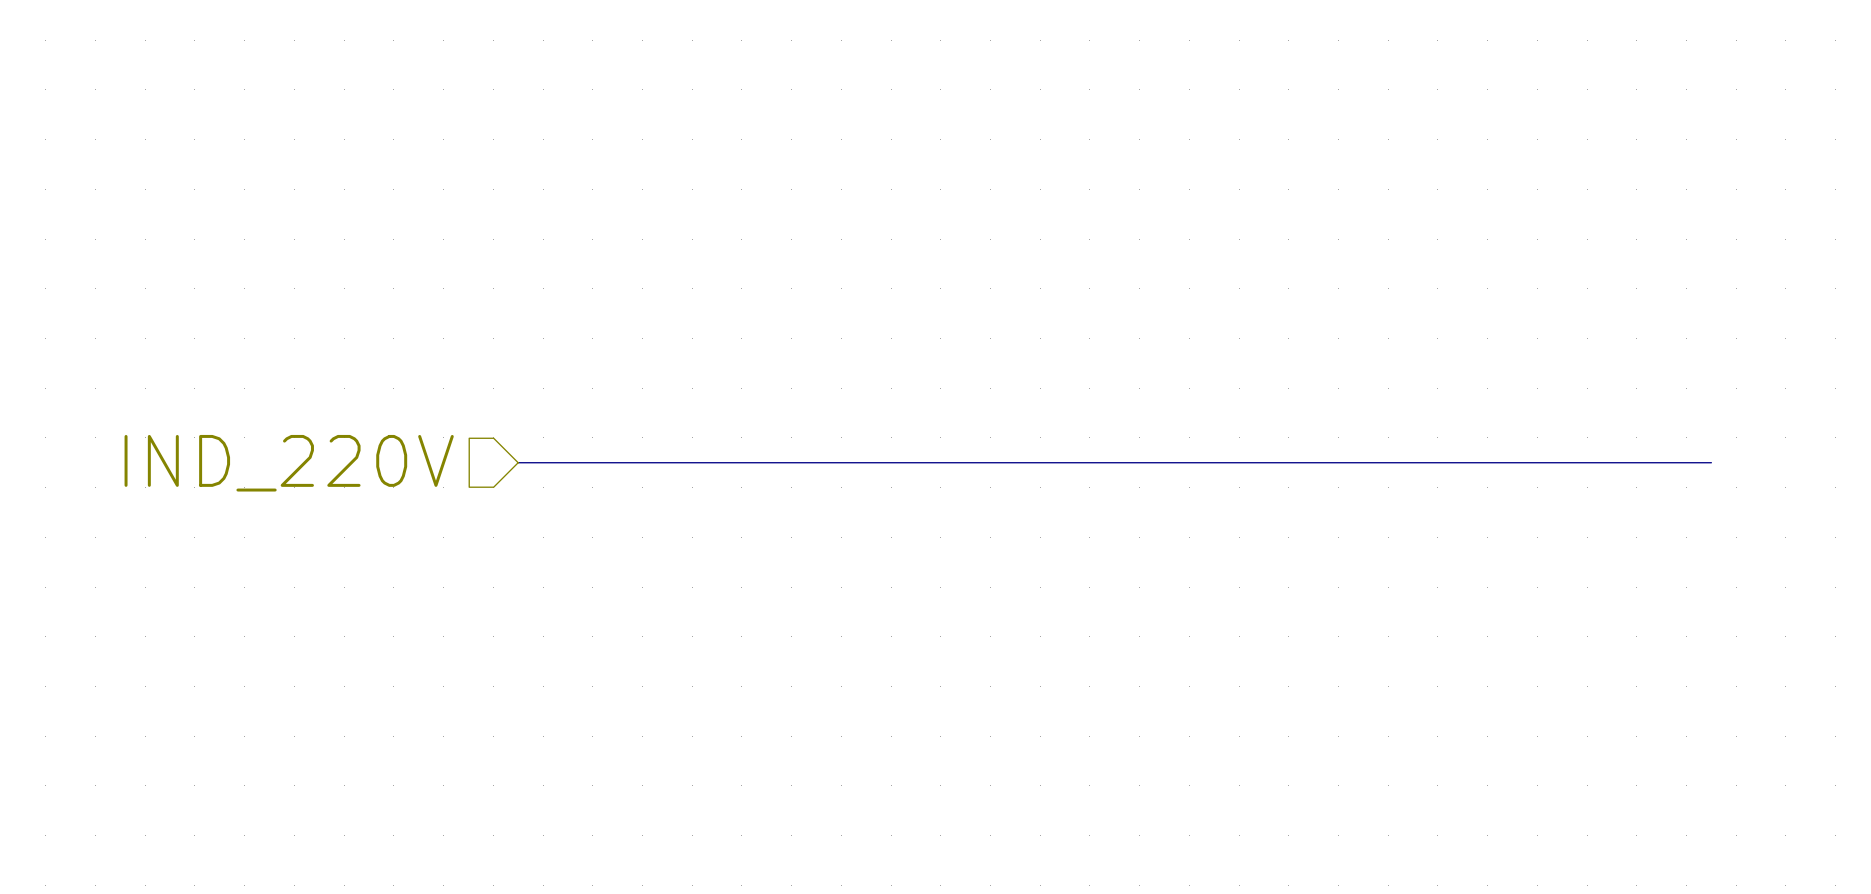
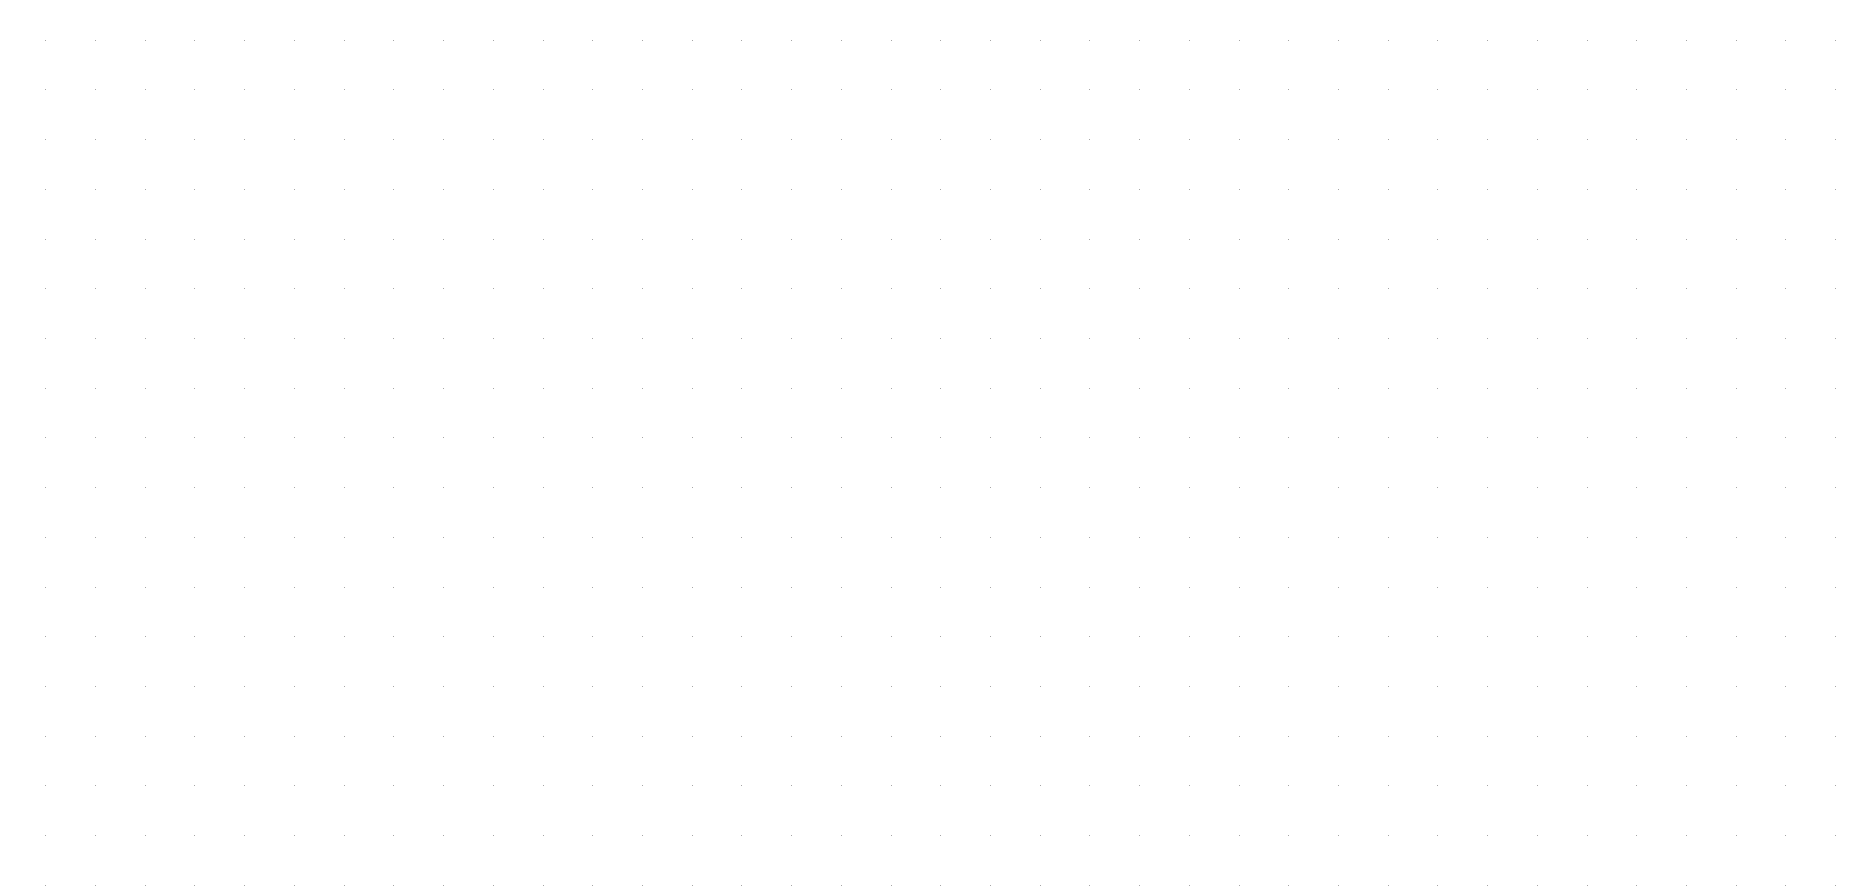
bus: (518, 462) (1711, 462) -> none
hierarchical label: IND_220V (289, 463) -> none

